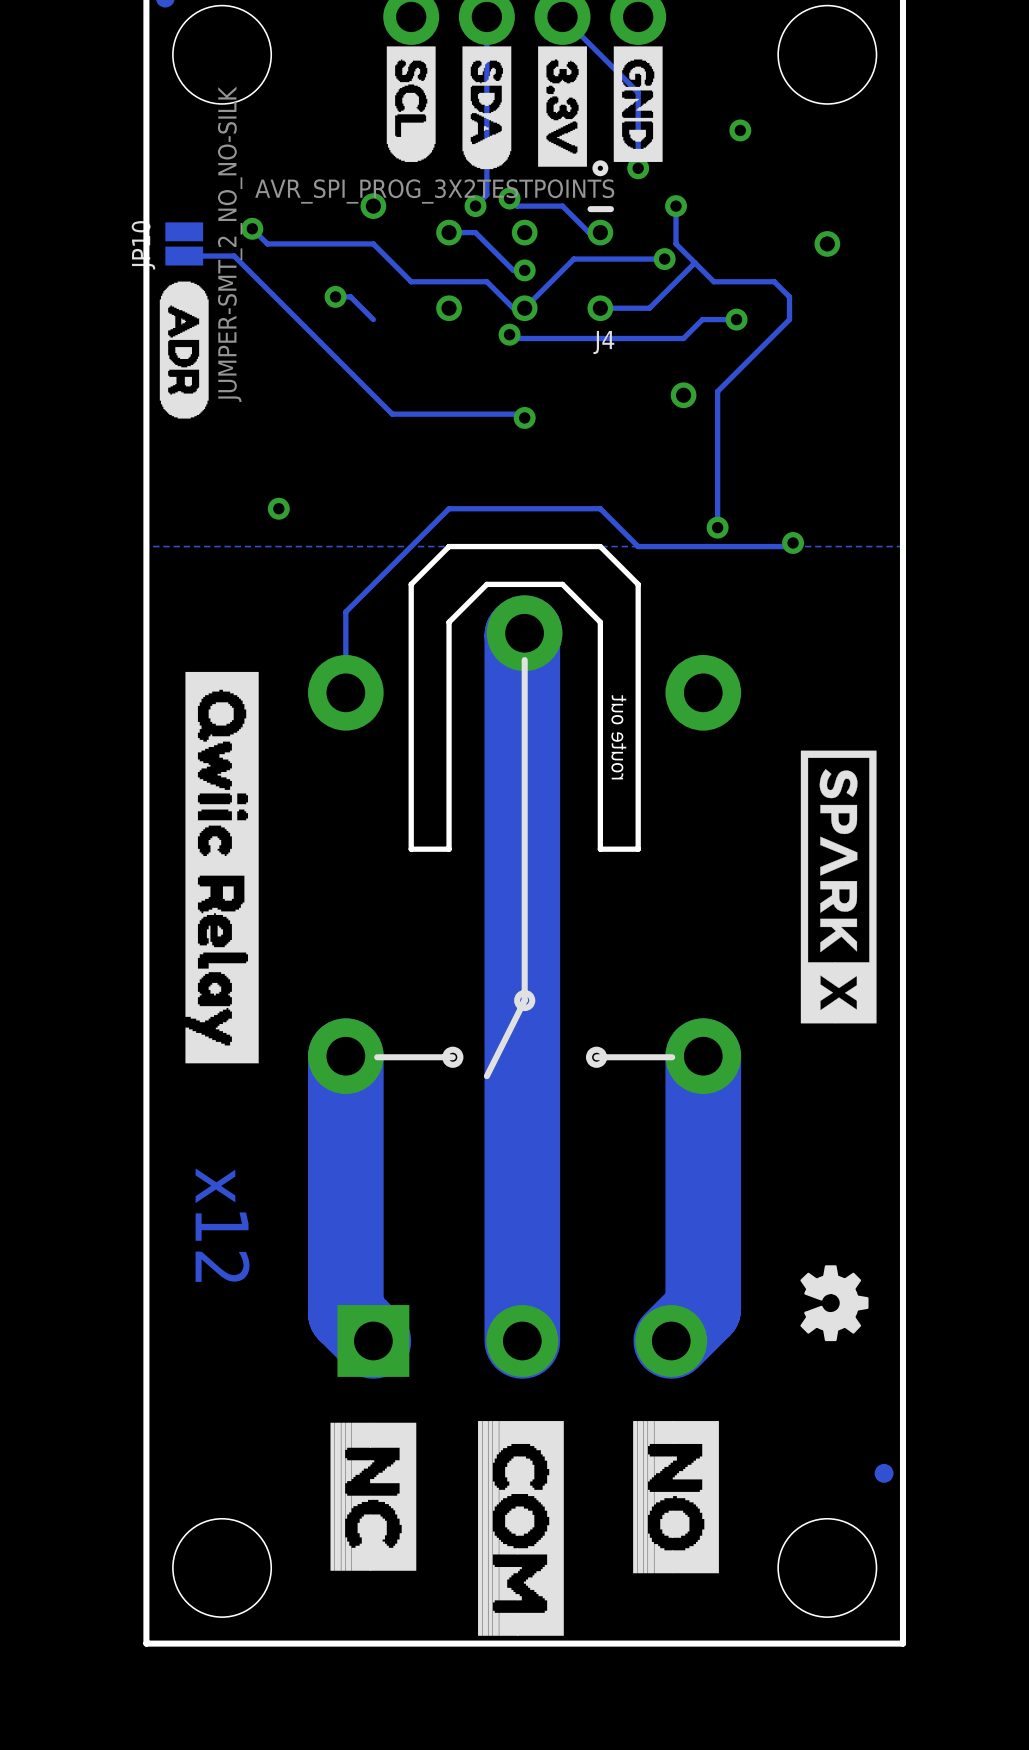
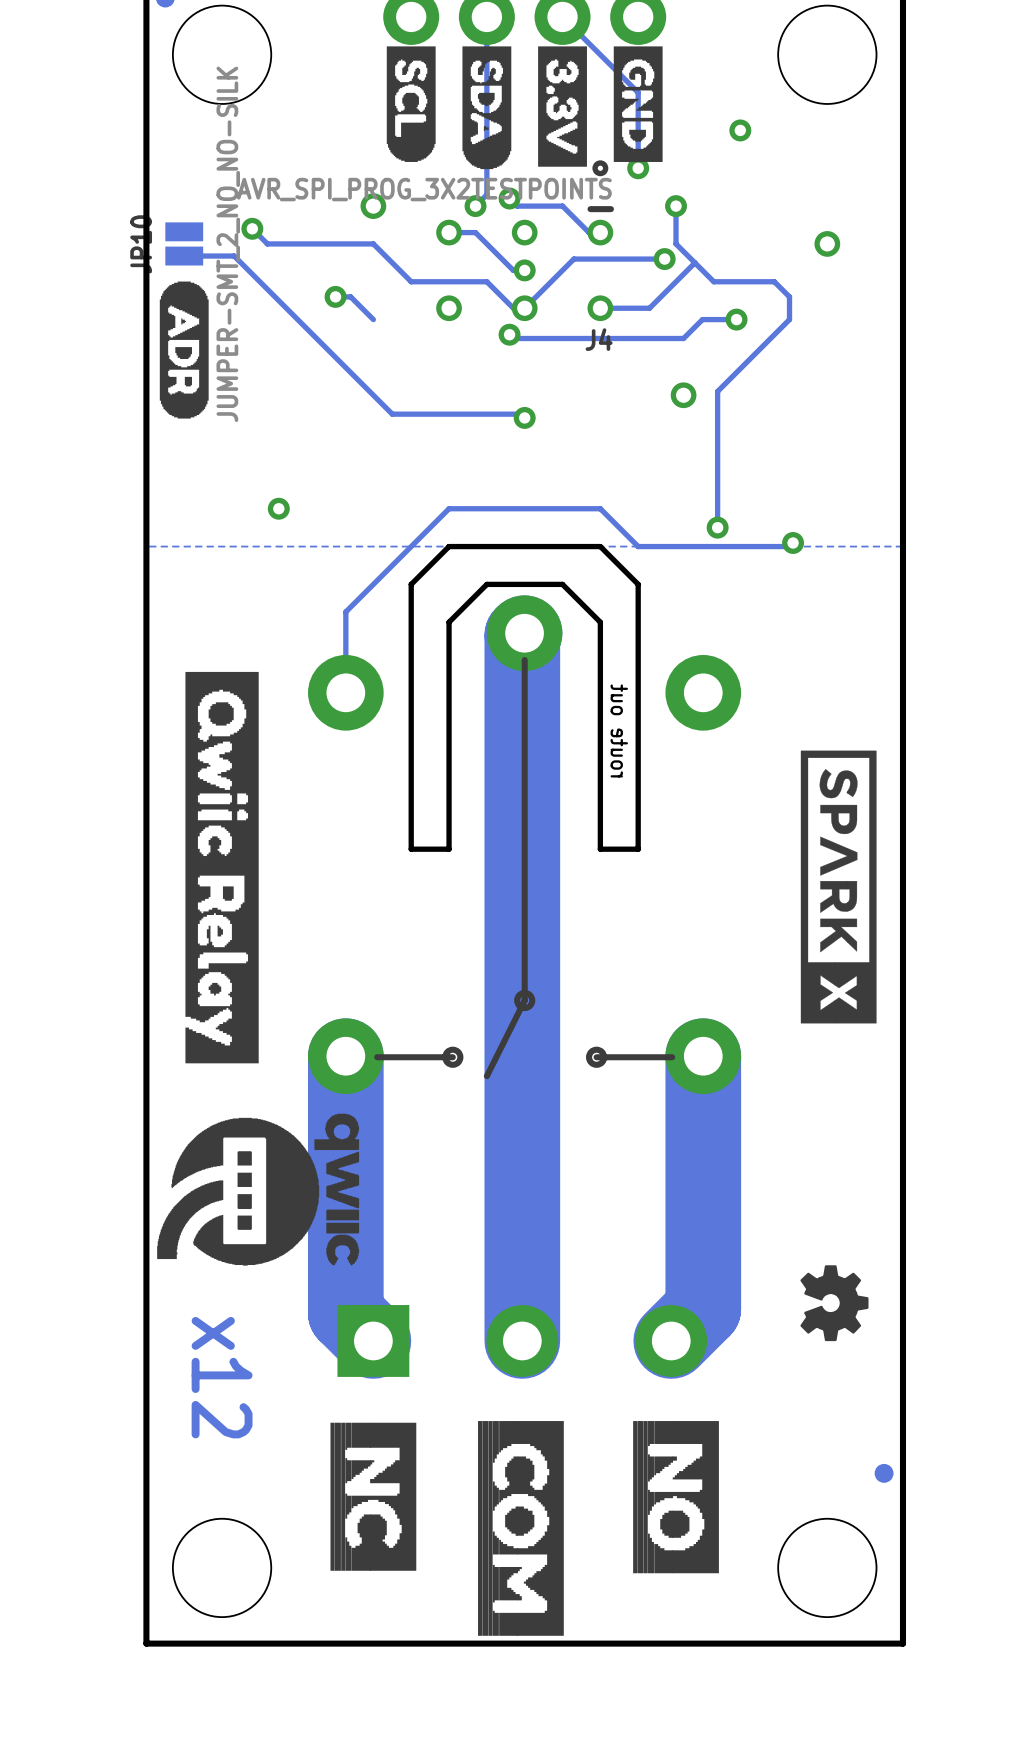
drawing: none -> [157, 1113, 360, 1266]
text position: x12 (222, 1225) -> x12 (222, 1377)

